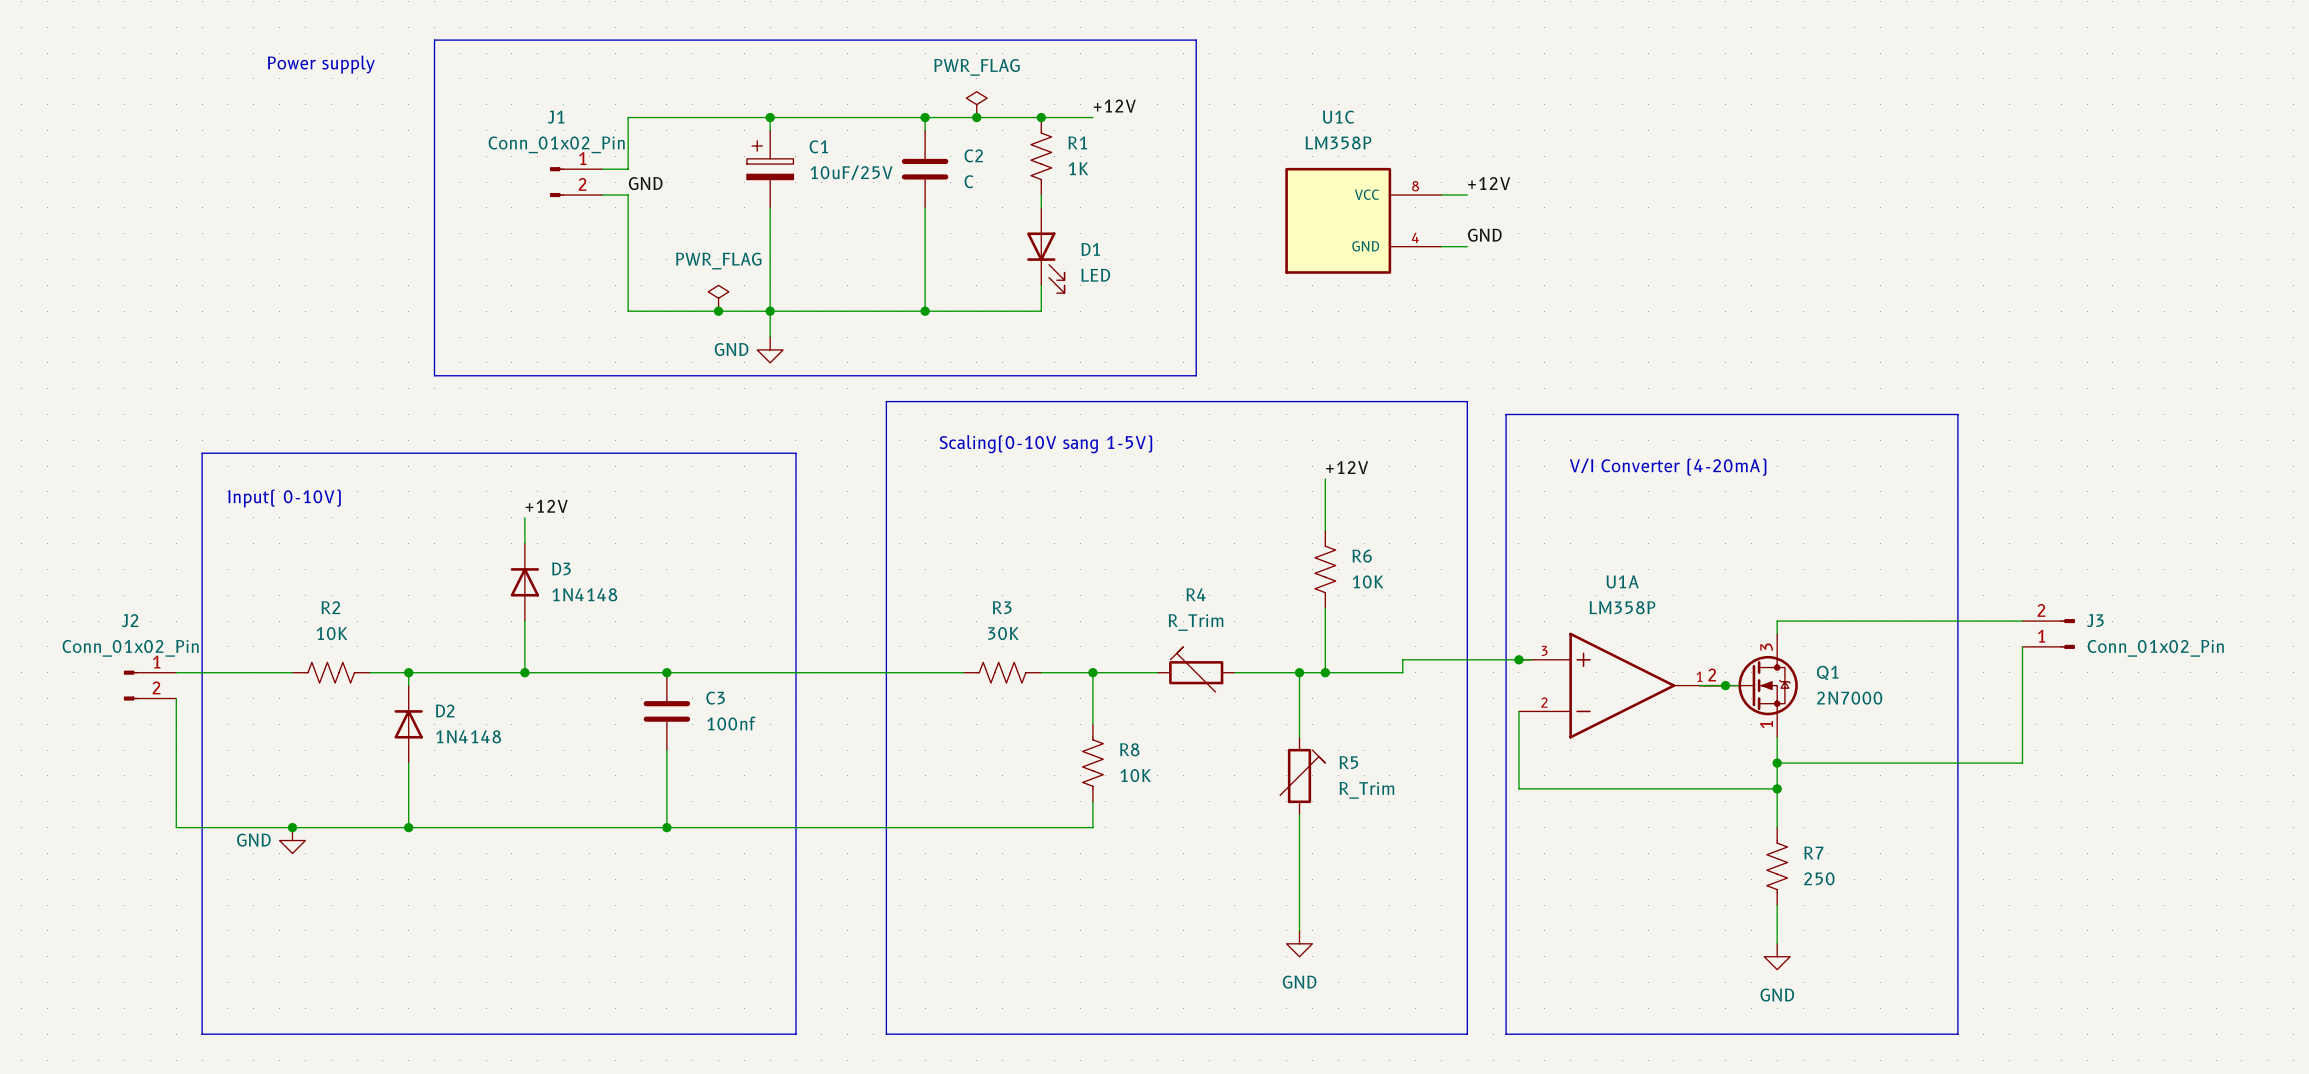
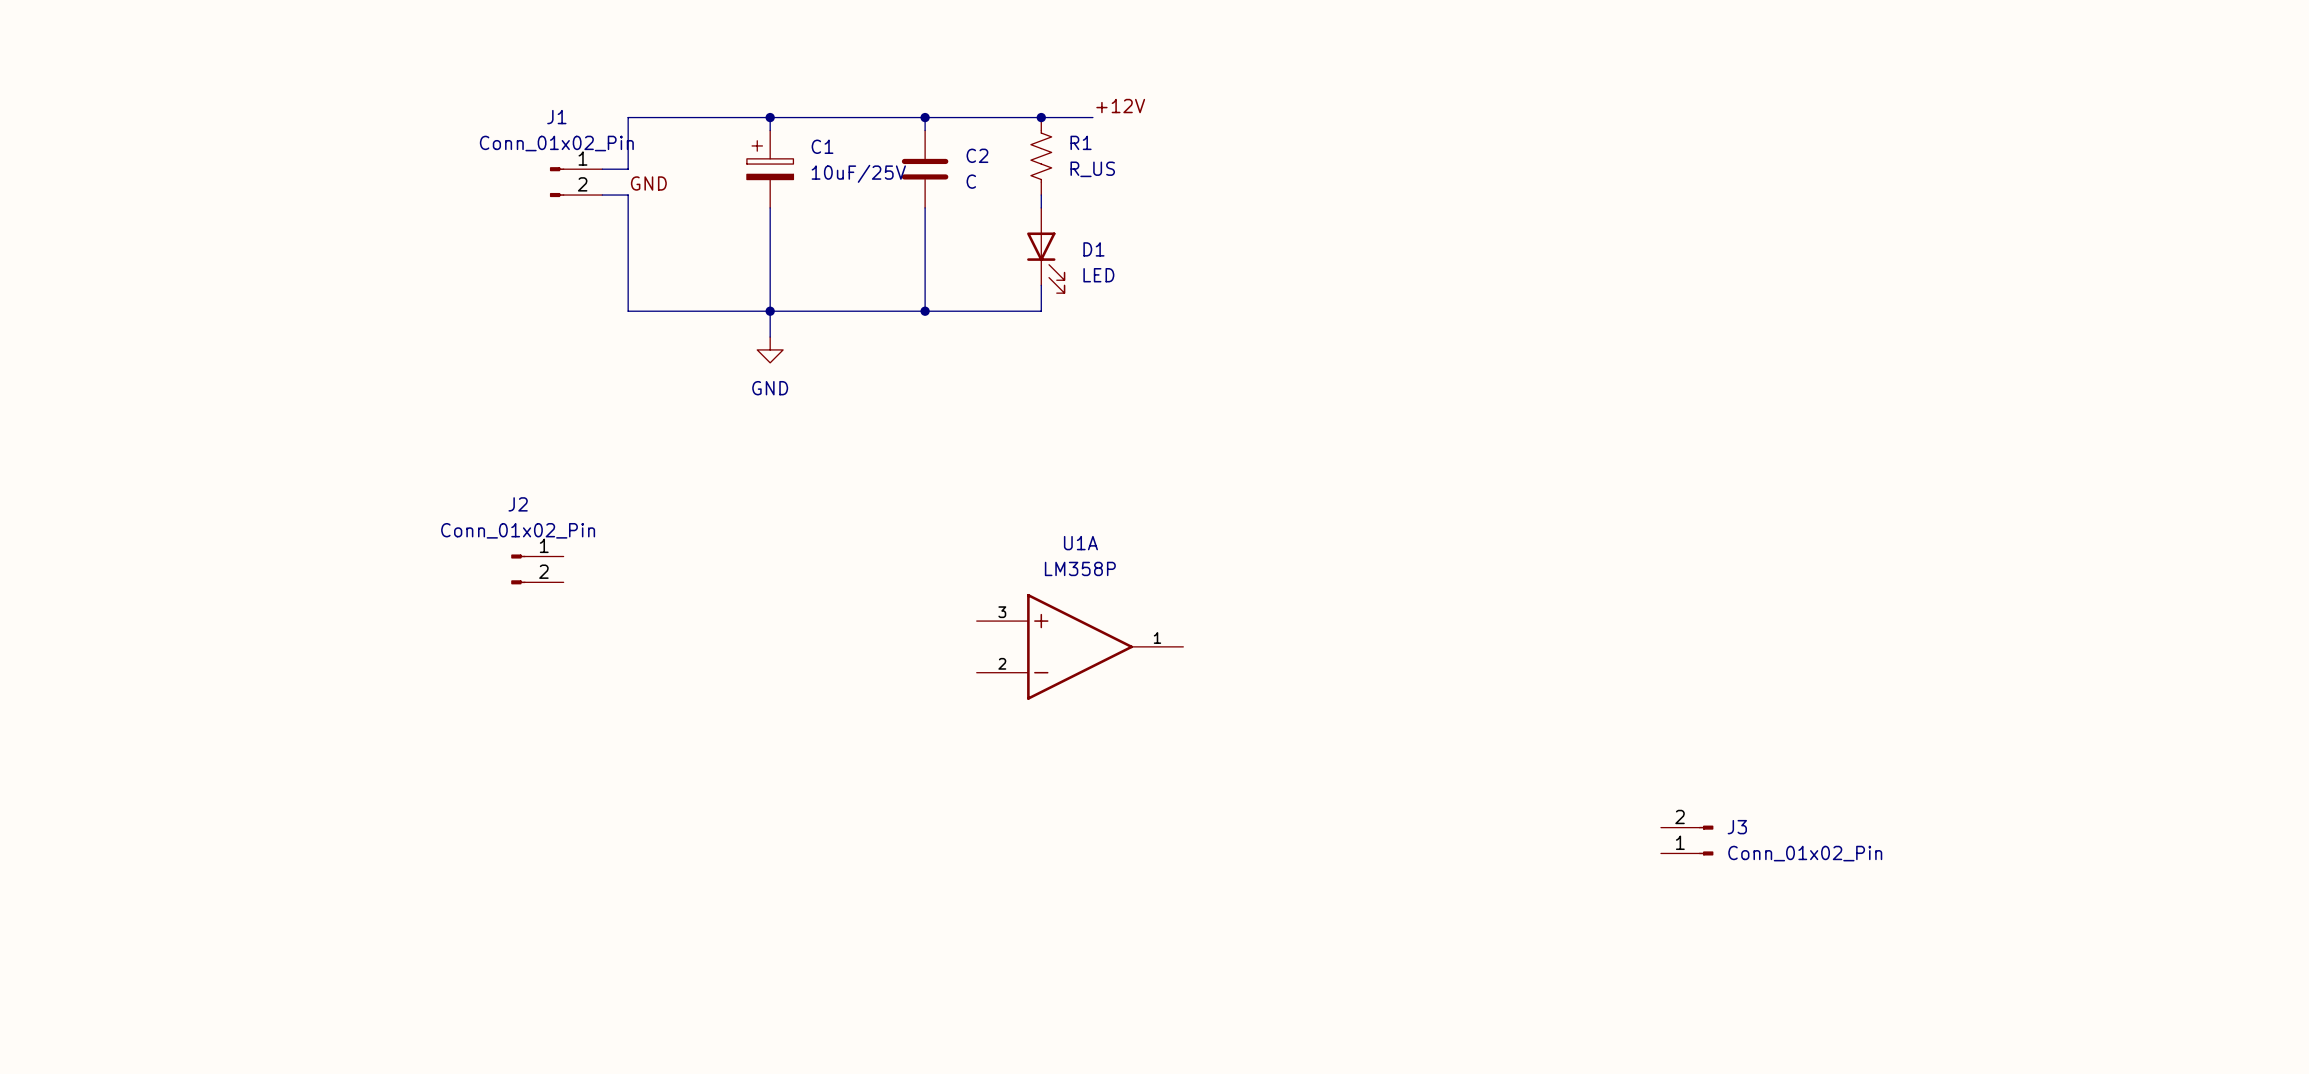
line: (434, 40) (1196, 40) (1196, 375) (434, 375) (434, 40) -> none
text: Power supply (321, 64) -> none
power symbol: PWR_FLAG (976, 104) -> none
junction: (976, 117) -> none
R1 value: 1K (1078, 168) -> R_US (1092, 169)
label: +12V (1489, 183) -> none
wire: (1441, 195) (1467, 195) -> none
U1C: LM358P (1363, 220) -> none
label: GND (1484, 235) -> none
wire: (1441, 246) (1467, 246) -> none
power symbol: PWR_FLAG (718, 298) -> none
junction: (718, 311) -> none
power symbol text position: GND (731, 349) -> GND (770, 388)
line: (886, 401) (1467, 401) (1467, 1034) (886, 1034) (886, 401) -> none
line: (1506, 414) (1957, 414) (1957, 1034) (1506, 1034) (1506, 414) -> none
text: Scaling(0-10V sang 1-5V) (1045, 444) -> none
line: (202, 453) (795, 453) (795, 1034) (202, 1034) (202, 453) -> none
label: +12V (1347, 467) -> none
text: V/I Converter (4-20mA) (1668, 467) -> none
wire: (1325, 479) (1325, 530) -> none
text: Input( 0-10V) (284, 498) -> none
label: +12V (546, 506) -> none
wire: (524, 517) (524, 543) -> none
R6: 10K (1325, 569) -> none
D3: 1N4148 (524, 582) -> none
wire: (1325, 608) (1325, 672) -> none
wire: (524, 621) (524, 672) -> none
wire: (2022, 621) (1777, 621) (1777, 633) -> none
J3 position: (2048, 633) -> (1687, 840)
wire: (2022, 646) (2022, 763) (1777, 763) -> none
junction: (1518, 659) -> none
wire: (1531, 659) (1402, 659) (1402, 672) (1234, 672) -> none
R4: R_Trim (1196, 669) -> none
wire: (176, 672) (292, 672) -> none
R2: 10K (331, 672) -> none
wire: (369, 672) (963, 672) -> none
wire: (408, 672) (408, 685) -> none
junction: (408, 672) -> none
junction: (524, 672) -> none
junction: (666, 672) -> none
R3: 30K (1002, 672) -> none
wire: (1041, 672) (1157, 672) -> none
wire: (1092, 672) (1092, 724) -> none
junction: (1092, 672) -> none
wire: (1299, 672) (1299, 737) -> none
junction: (1299, 672) -> none
junction: (1325, 672) -> none
J2 position: (150, 685) -> (537, 569)
U1A position: (1622, 685) -> (1080, 646)
wire: (1699, 685) (1738, 685) -> none
junction: (1725, 685) -> none
Q1: 2N7000 (1748, 685) -> none
wire: (176, 698) (176, 827) (1092, 827) (1092, 801) -> none
C3: 100nf (666, 711) -> none
wire: (1518, 711) (1518, 788) (1777, 788) -> none
D2: 1N4148 (408, 724) -> none
wire: (1777, 737) (1777, 827) -> none
wire: (666, 750) (666, 827) -> none
wire: (408, 763) (408, 827) -> none
R8: 10K (1092, 763) -> none
junction: (1777, 763) -> none
R5: R_Trim (1302, 775) -> none
junction: (1777, 788) -> none
wire: (1299, 814) (1299, 930) -> none
junction: (292, 827) -> none
junction: (408, 827) -> none
junction: (666, 827) -> none
power symbol: GND (292, 840) -> none
R7: 250 (1777, 866) -> none
wire: (1777, 905) (1777, 943) -> none
power symbol: GND (1299, 943) -> none
power symbol: GND (1777, 956) -> none

